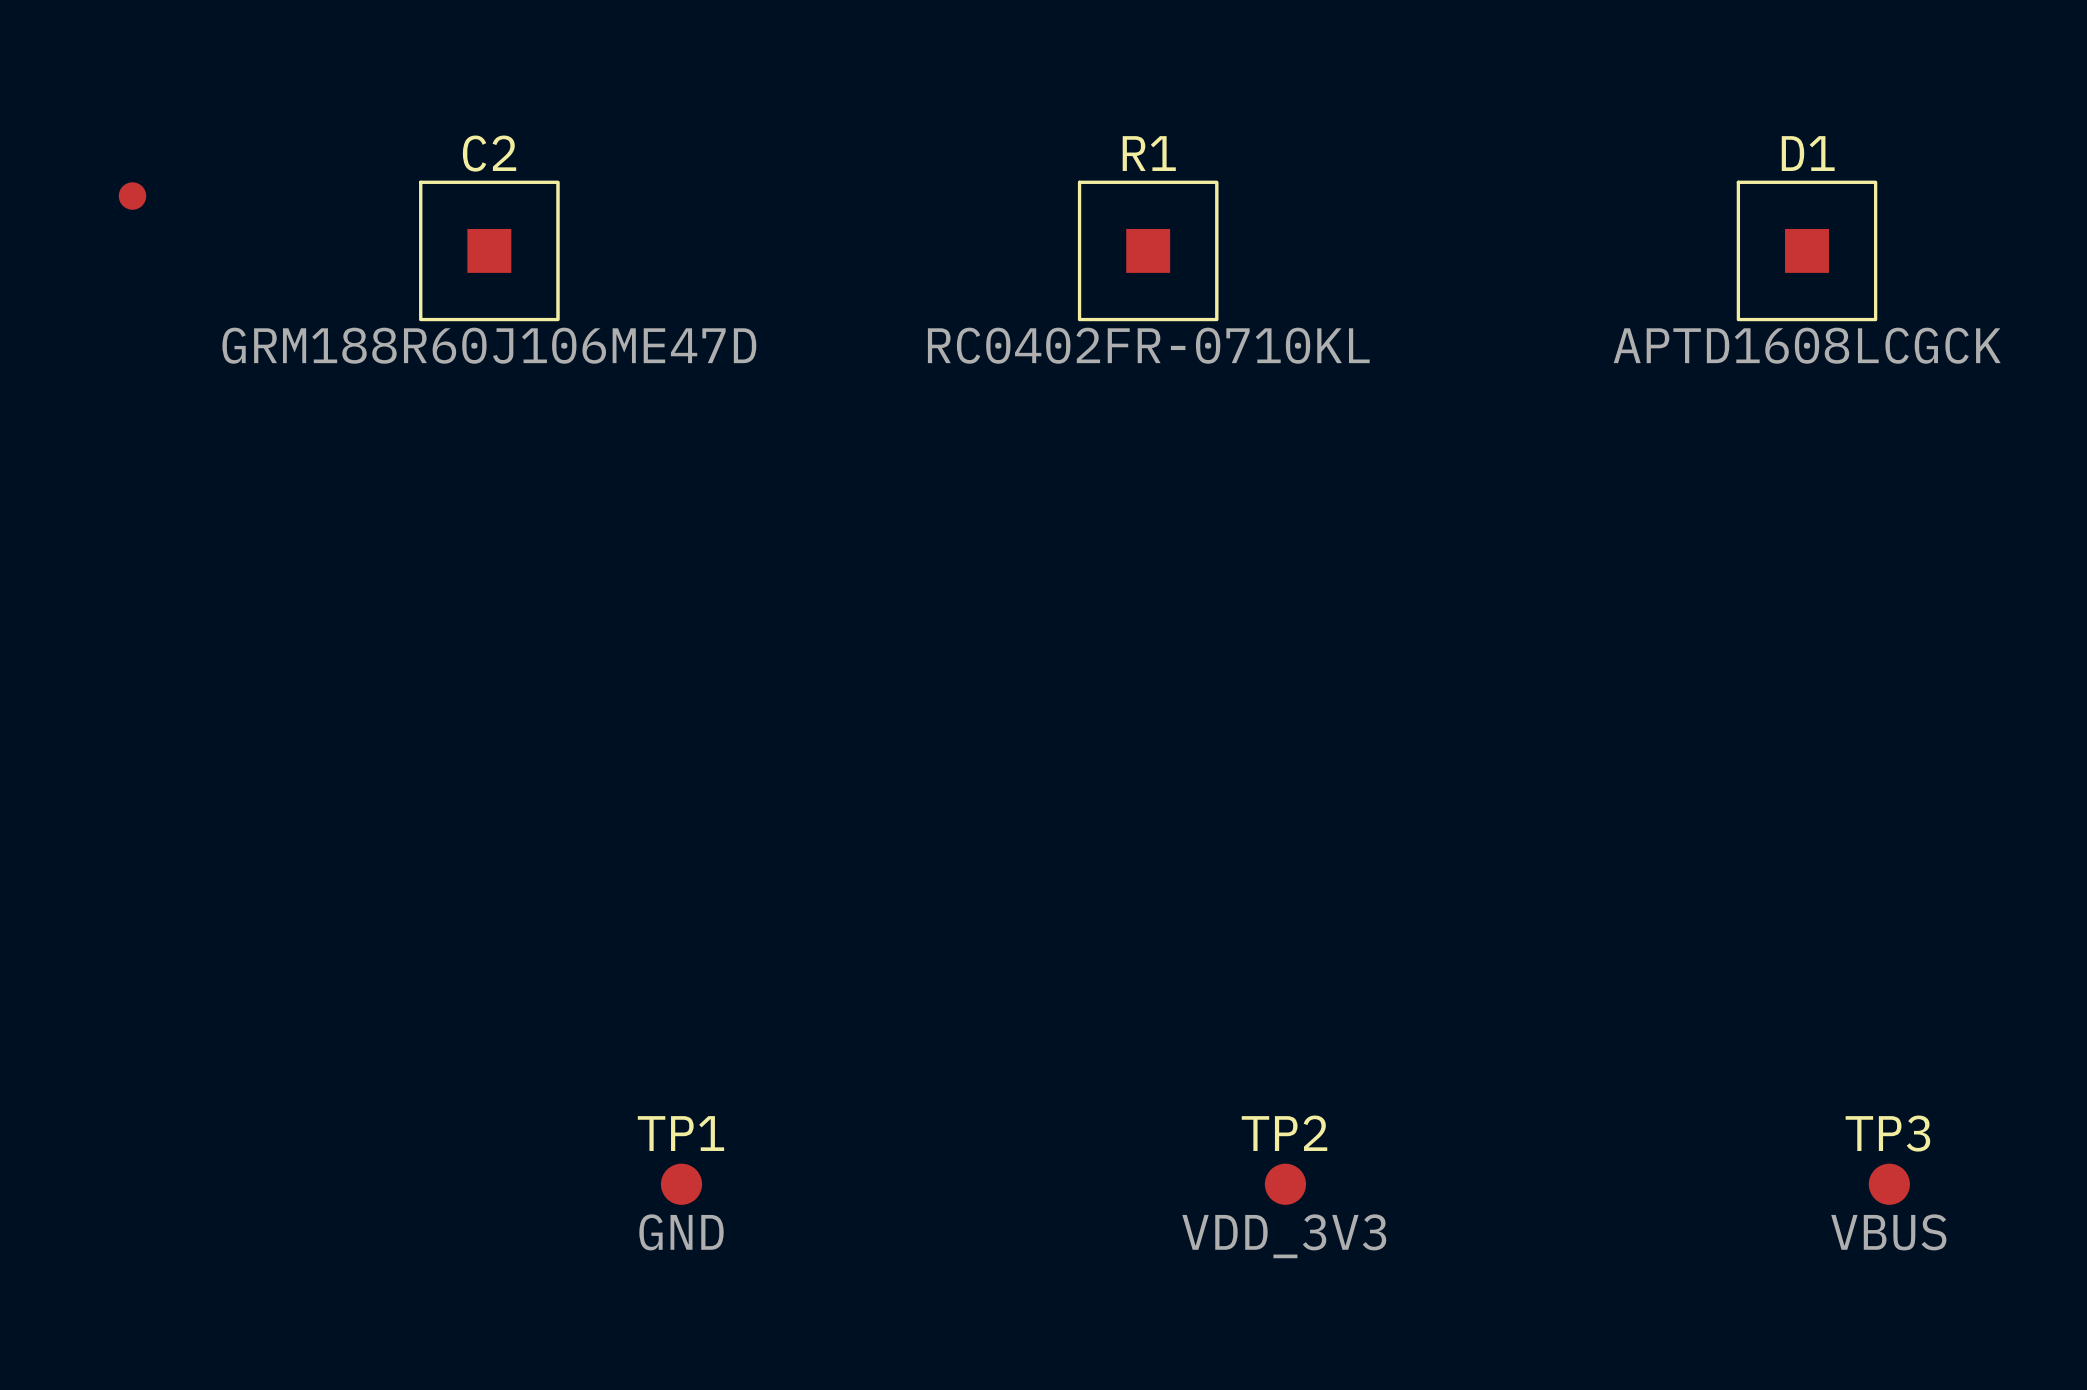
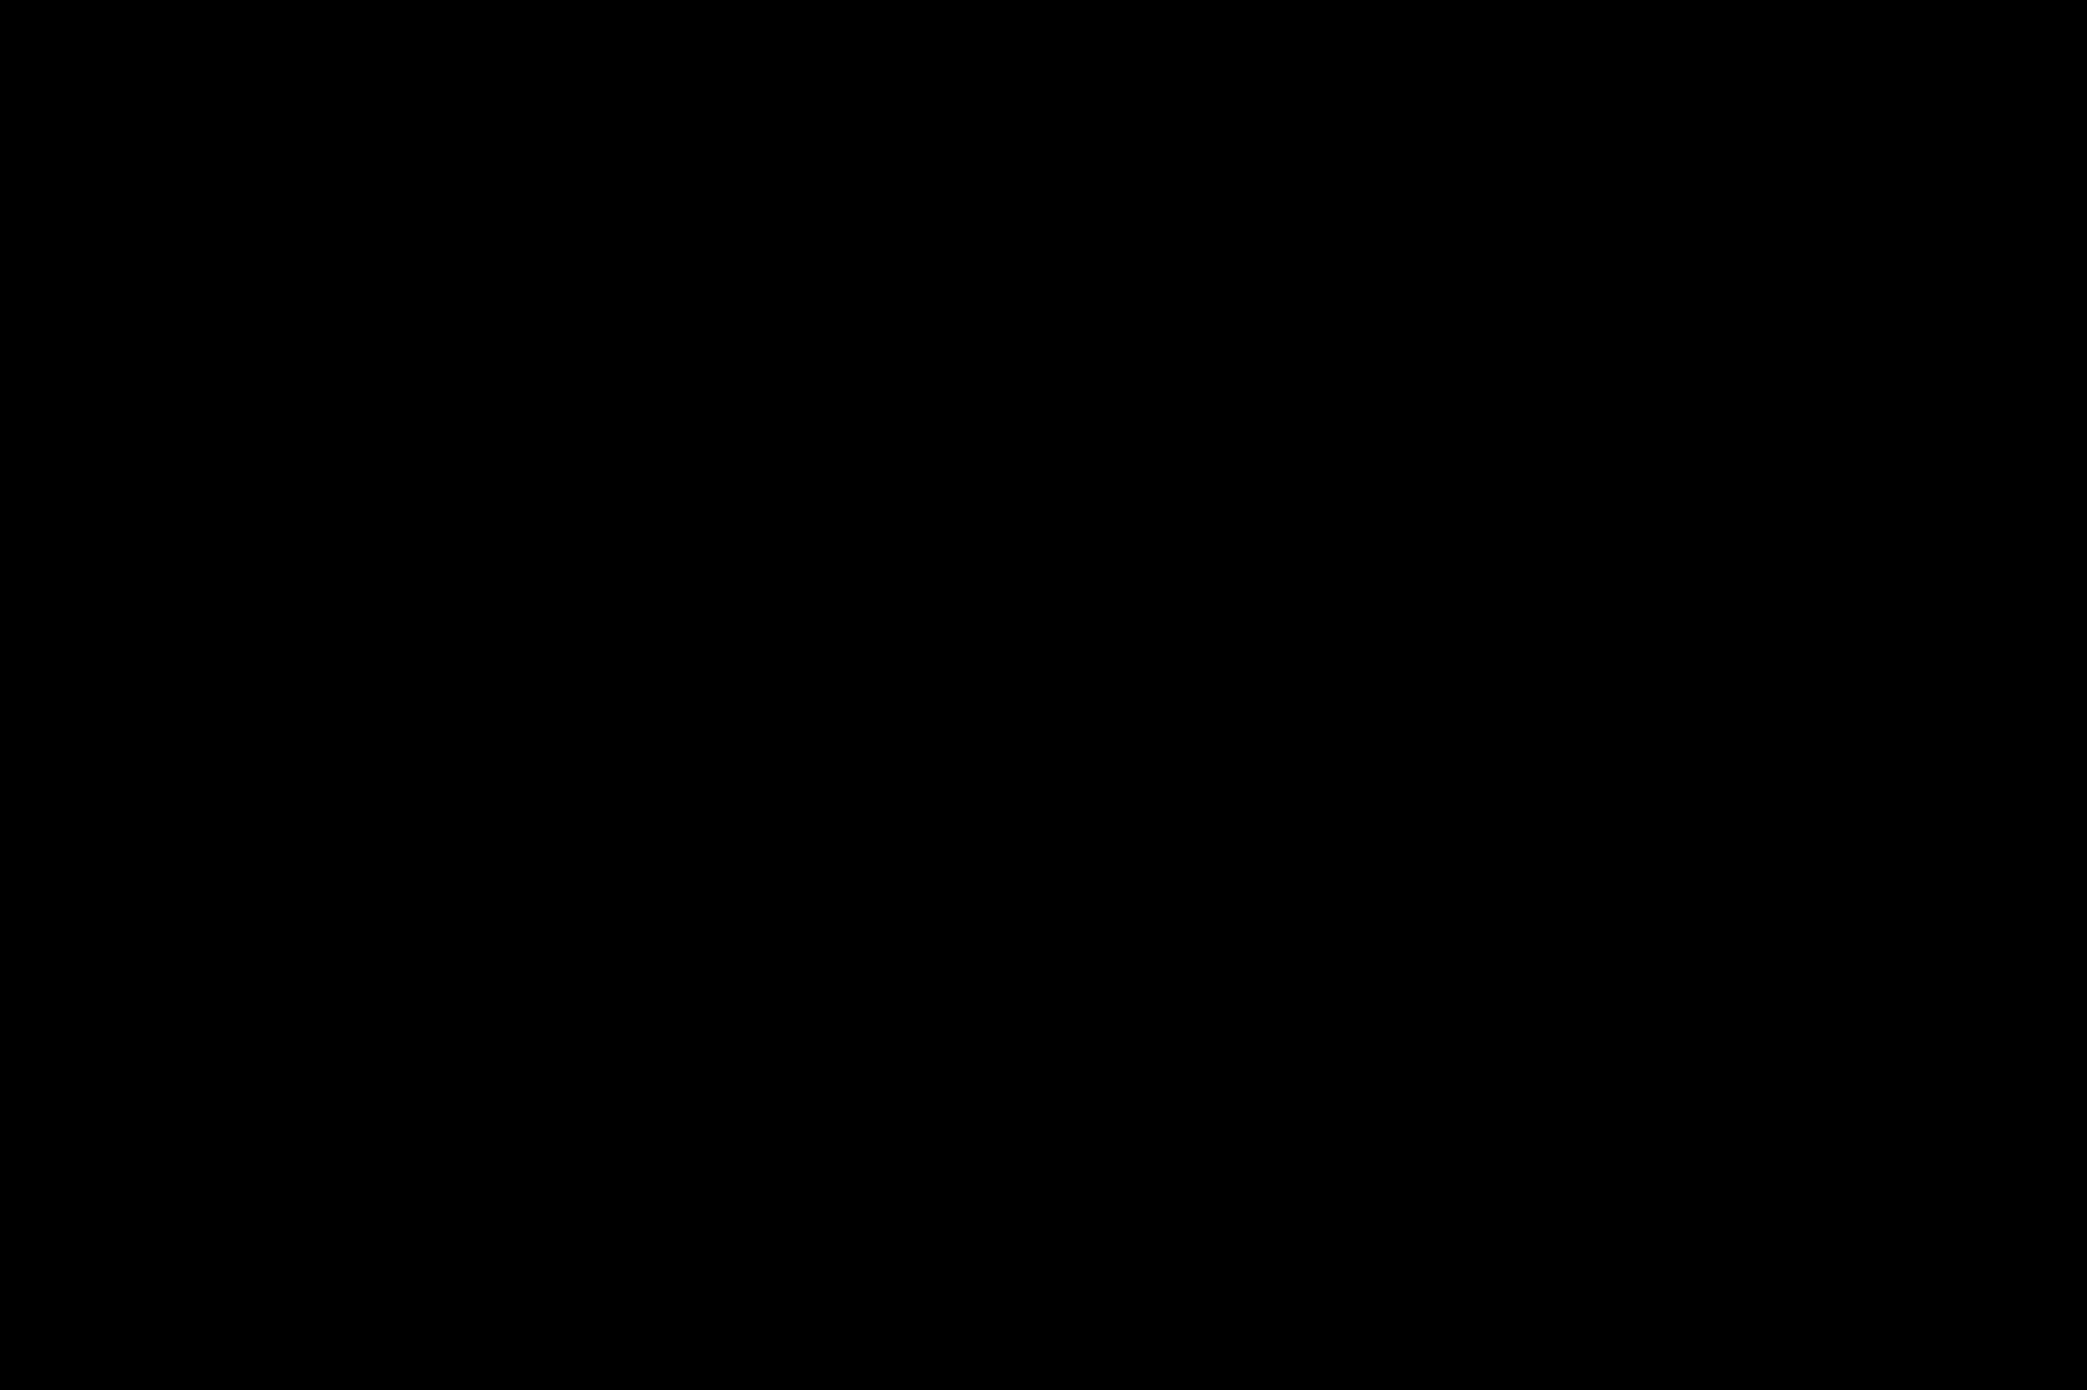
part: (132, 196) -> none
C2: GRM188R60J106ME47D (489, 250) -> none
R1: RC0402FR-0710KL (1148, 250) -> none
D1: APTD1608LCGCK (1807, 250) -> none
TP1: GND (681, 1184) -> none
TP2: VDD_3V3 (1285, 1184) -> none
TP3: VBUS (1889, 1184) -> none

